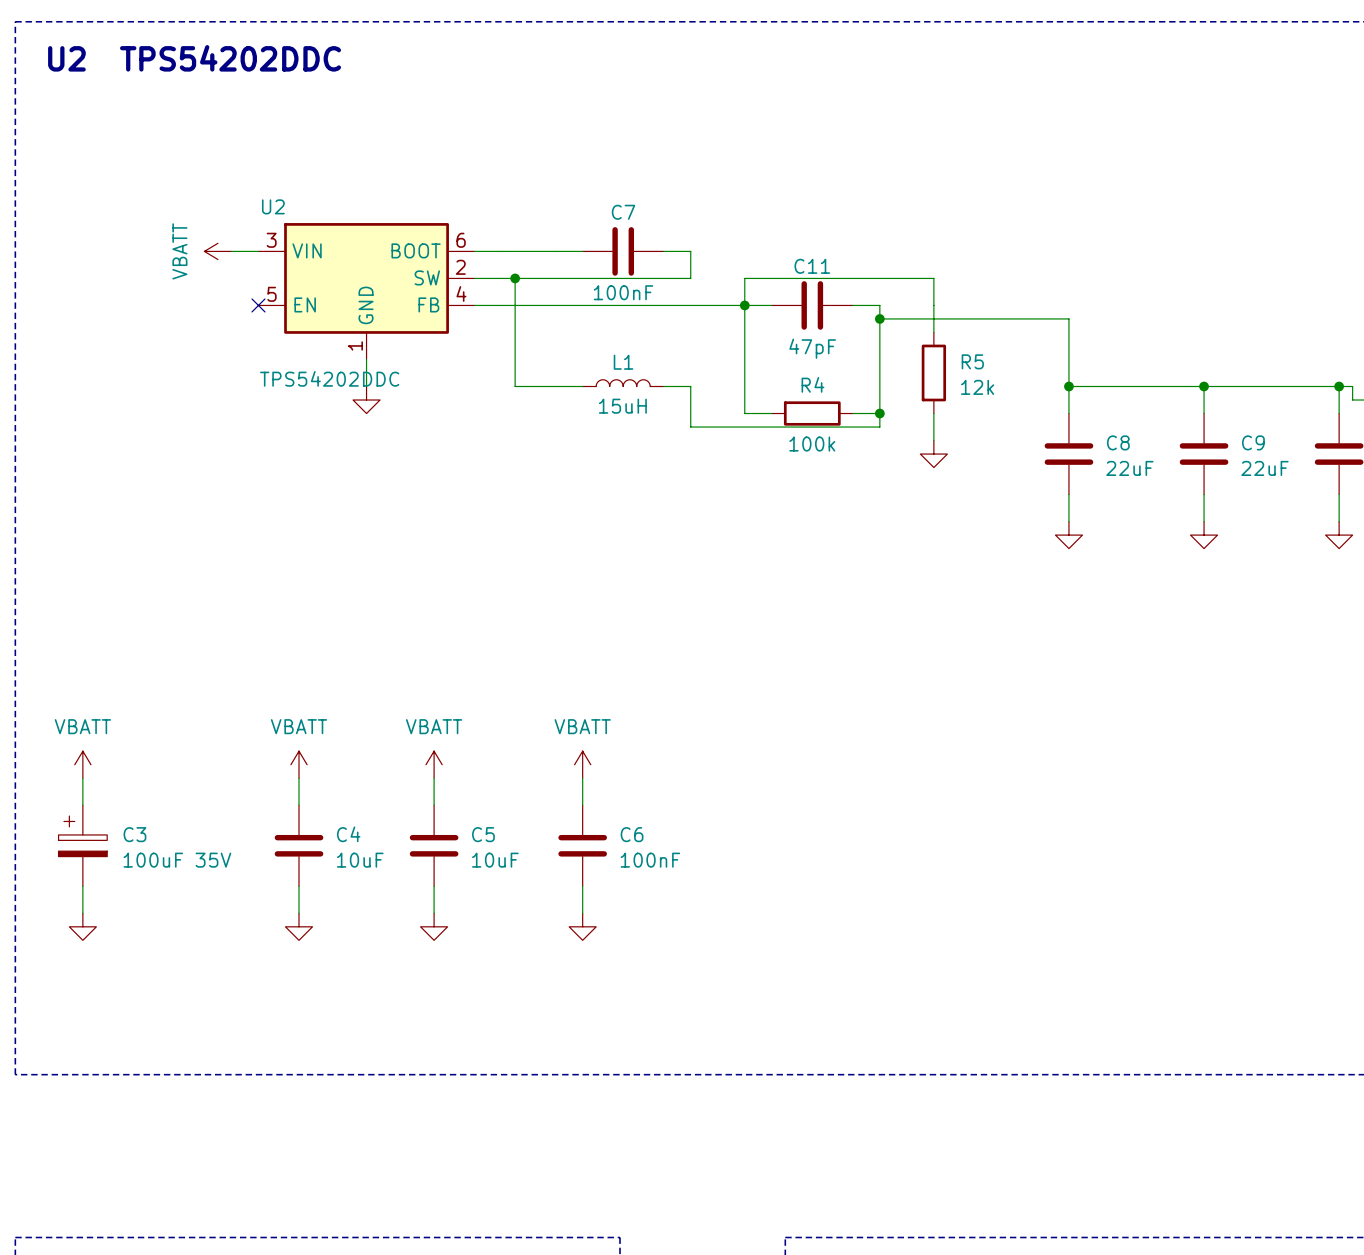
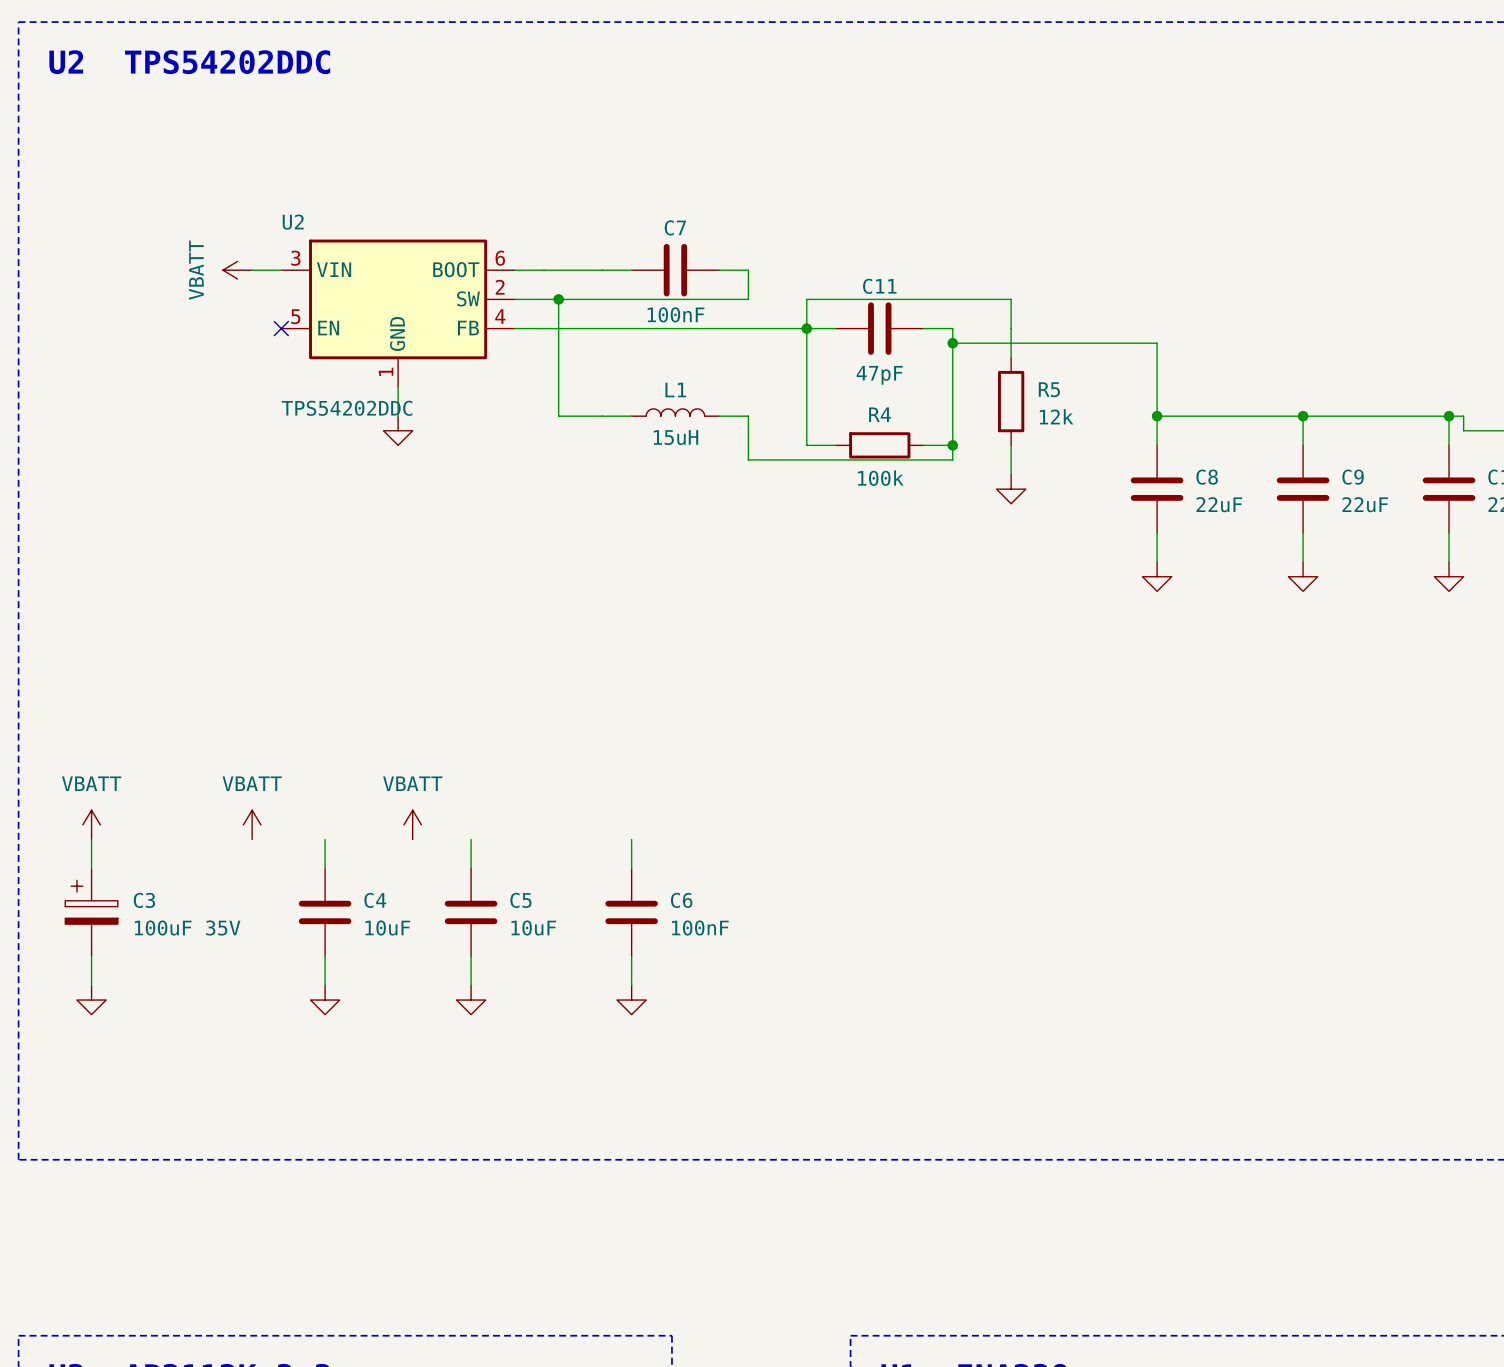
power symbol: none -> VBATT (252, 824)
power symbol: VBATT (299, 764) -> none
power symbol: none -> VBATT (412, 824)
power symbol: VBATT (434, 764) -> none
power symbol: VBATT (582, 764) -> none

